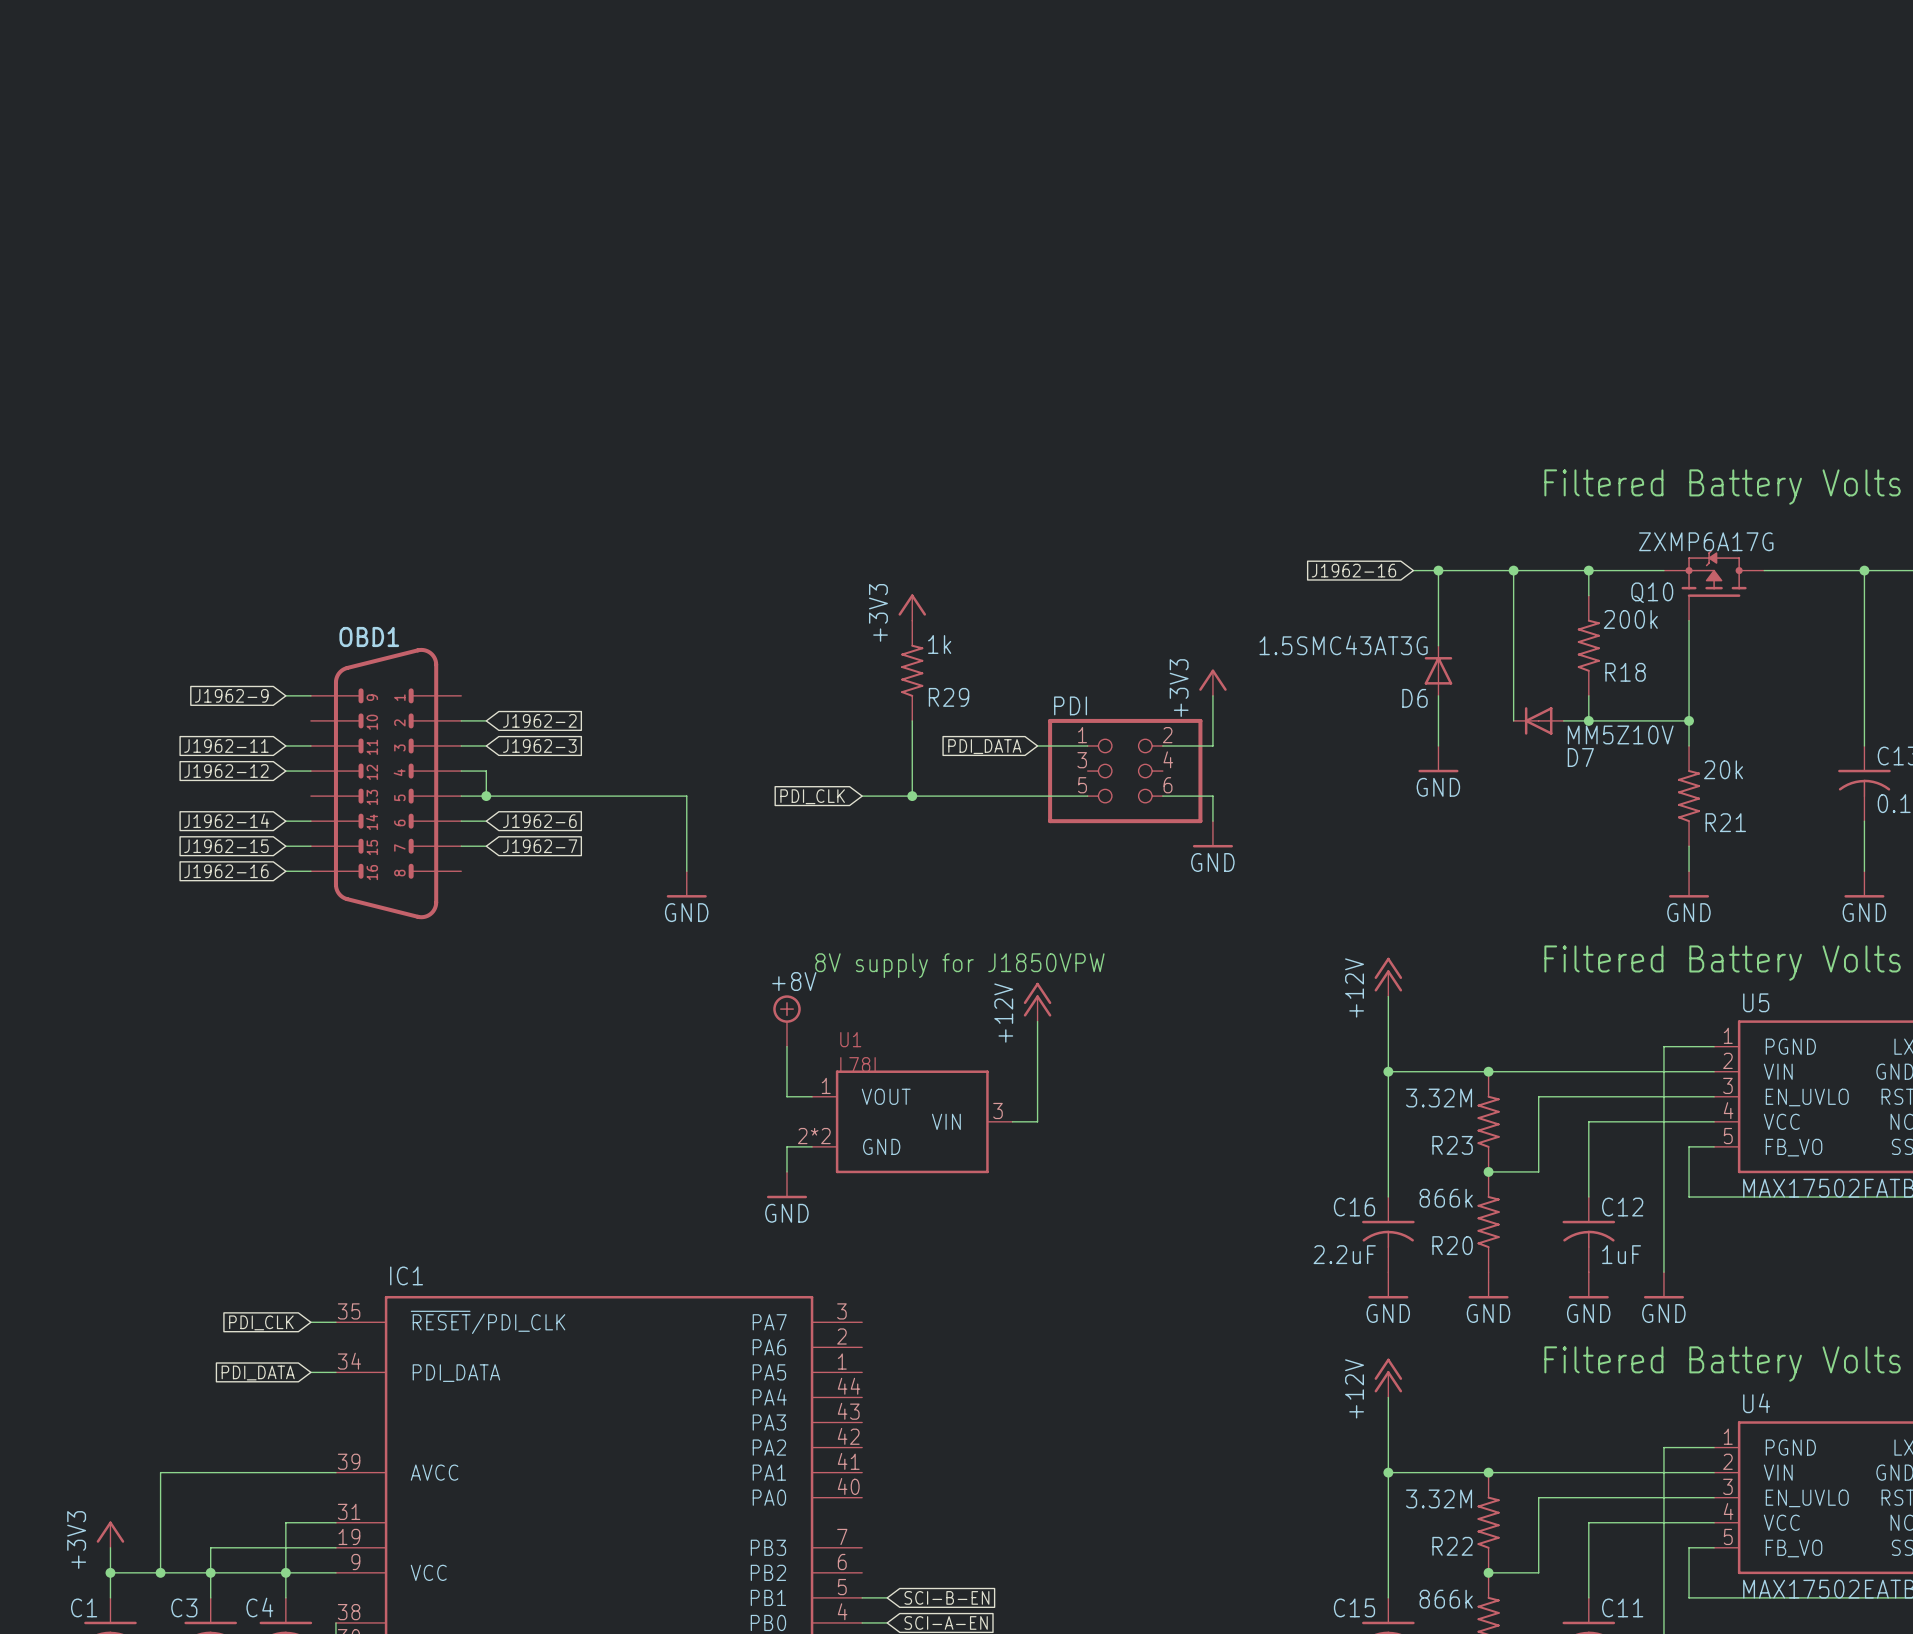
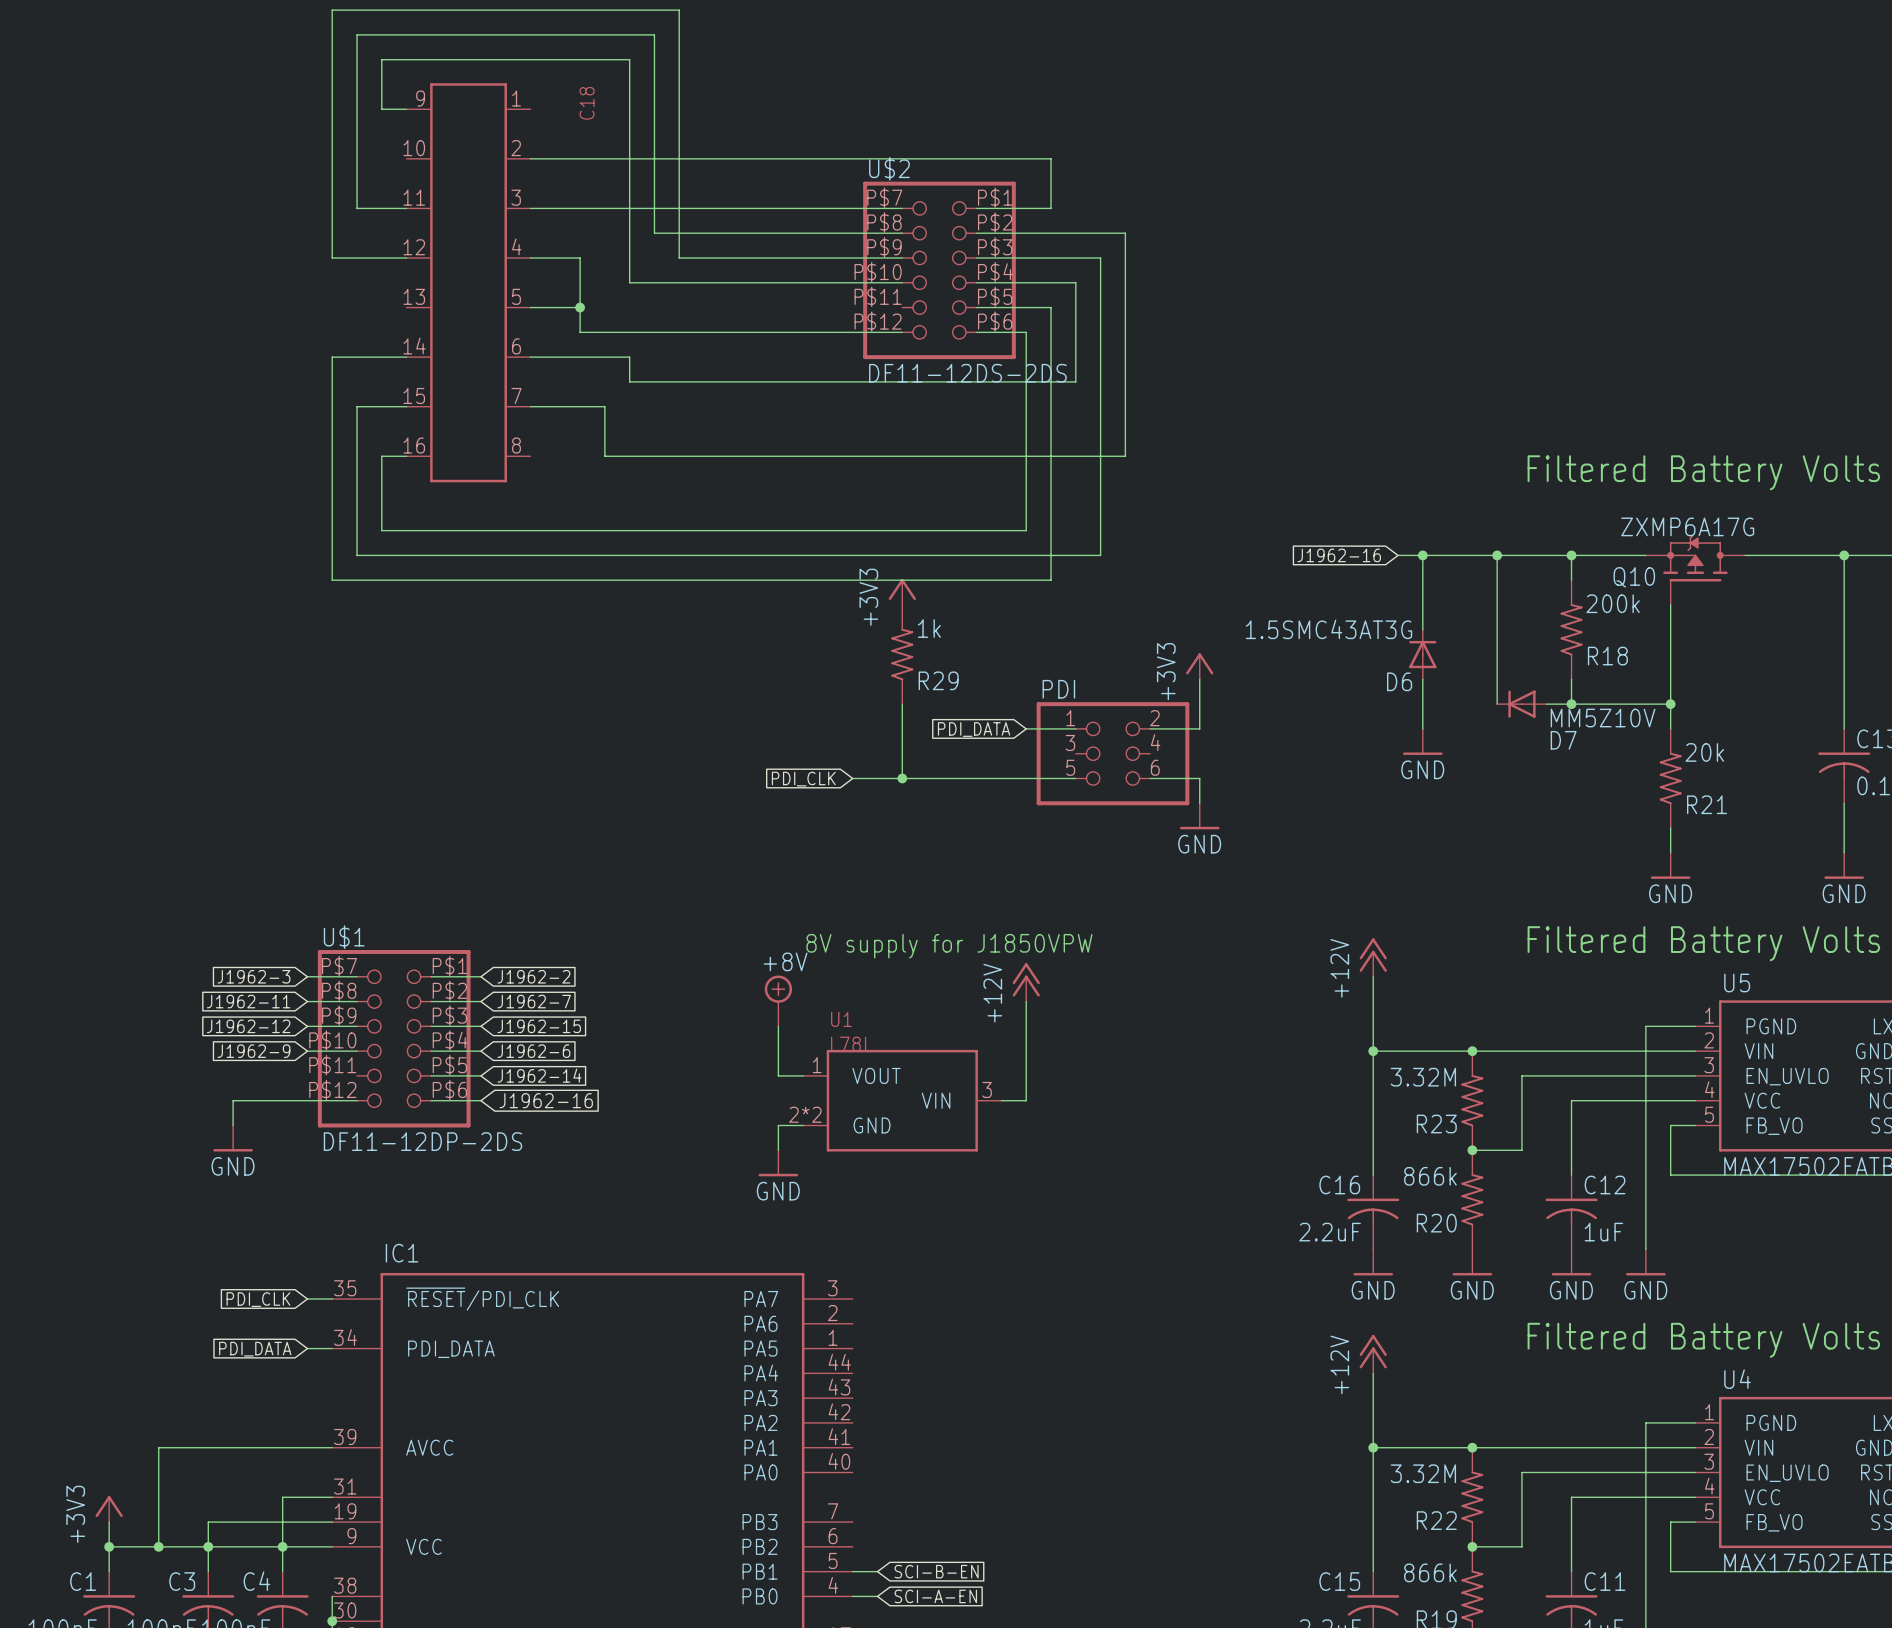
wire: none -> (406, 109) (381, 109) (381, 59) (629, 59) (629, 282) (902, 282)
wire: none -> (530, 158) (1051, 158) (1051, 208) (976, 208)
wire: none -> (406, 208) (357, 208) (357, 34) (654, 34) (654, 233) (902, 233)
wire: none -> (530, 208) (902, 208)
wire: none -> (976, 233) (1125, 233) (1125, 456) (604, 456) (604, 406) (530, 406)
wire: none -> (406, 257) (332, 257) (332, 10) (679, 10) (679, 257) (902, 257)
wire: none -> (530, 257) (580, 257) (580, 332) (902, 332)
wire: none -> (976, 257) (1100, 257) (1100, 555) (357, 555) (357, 406) (406, 406)
U$2: none -> DF11-12DS-2DS (939, 270)
C18: none -> (468, 282)
wire: none -> (976, 282) (1075, 282) (1075, 381) (629, 381) (629, 357) (530, 357)
wire: none -> (530, 307) (580, 307)
junction: none -> (580, 307)
wire: none -> (976, 307) (1051, 307) (1051, 580) (332, 580) (332, 357) (406, 357)
wire: none -> (976, 332) (1026, 332) (1026, 530) (381, 530) (381, 456) (406, 456)
global label: J1962-9 (231, 695) -> none
wire: (285, 695) (310, 695) -> none
wire: (461, 720) (486, 720) -> none
global label: J1962-2 (539, 720) -> none
global label: J1962-11 (226, 745) -> none
wire: (285, 745) (310, 745) -> none
wire: (461, 745) (486, 745) -> none
global label: J1962-3 (539, 745) -> none
global label: J1962-12 (226, 771) -> none
wire: (285, 771) (310, 771) -> none
wire: (461, 771) (486, 771) (486, 796) -> none
OBD1: (386, 783) -> none
wire: (461, 796) (686, 796) (686, 871) -> none
junction: (486, 796) -> none
global label: J1962-14 (226, 820) -> none
wire: (285, 821) (310, 821) -> none
wire: (461, 821) (486, 821) -> none
global label: J1962-6 (539, 821) -> none
global label: J1962-15 (226, 846) -> none
wire: (285, 846) (310, 846) -> none
wire: (461, 846) (486, 846) -> none
global label position: J1962-7 (540, 846) -> J1962-7 (534, 1001)
global label: J1962-16 (226, 871) -> none
wire: (285, 871) (310, 871) -> none
power symbol: GND (686, 884) -> none
global label: none -> J1962-3 (253, 976)
wire: none -> (307, 976) (357, 976)
wire: none -> (431, 976) (480, 976)
global label: none -> J1962-2 (533, 976)
global label: none -> J1962-11 (248, 1001)
wire: none -> (307, 1001) (357, 1001)
wire: none -> (431, 1001) (480, 1001)
global label: none -> J1962-12 (248, 1026)
wire: none -> (307, 1026) (357, 1026)
wire: none -> (431, 1026) (480, 1026)
global label: none -> J1962-15 (539, 1026)
U$1: none -> DF11-12DP-2DS (394, 1038)
global label: none -> J1962-9 (253, 1051)
wire: none -> (307, 1051) (357, 1051)
wire: none -> (431, 1051) (480, 1051)
global label: none -> J1962-6 (533, 1051)
wire: none -> (431, 1075) (480, 1075)
global label: none -> J1962-14 (539, 1075)
wire: none -> (357, 1100) (233, 1100) (233, 1125)
wire: none -> (431, 1100) (480, 1100)
global label: none -> J1962-16 (546, 1100)
power symbol: none -> GND (233, 1138)

